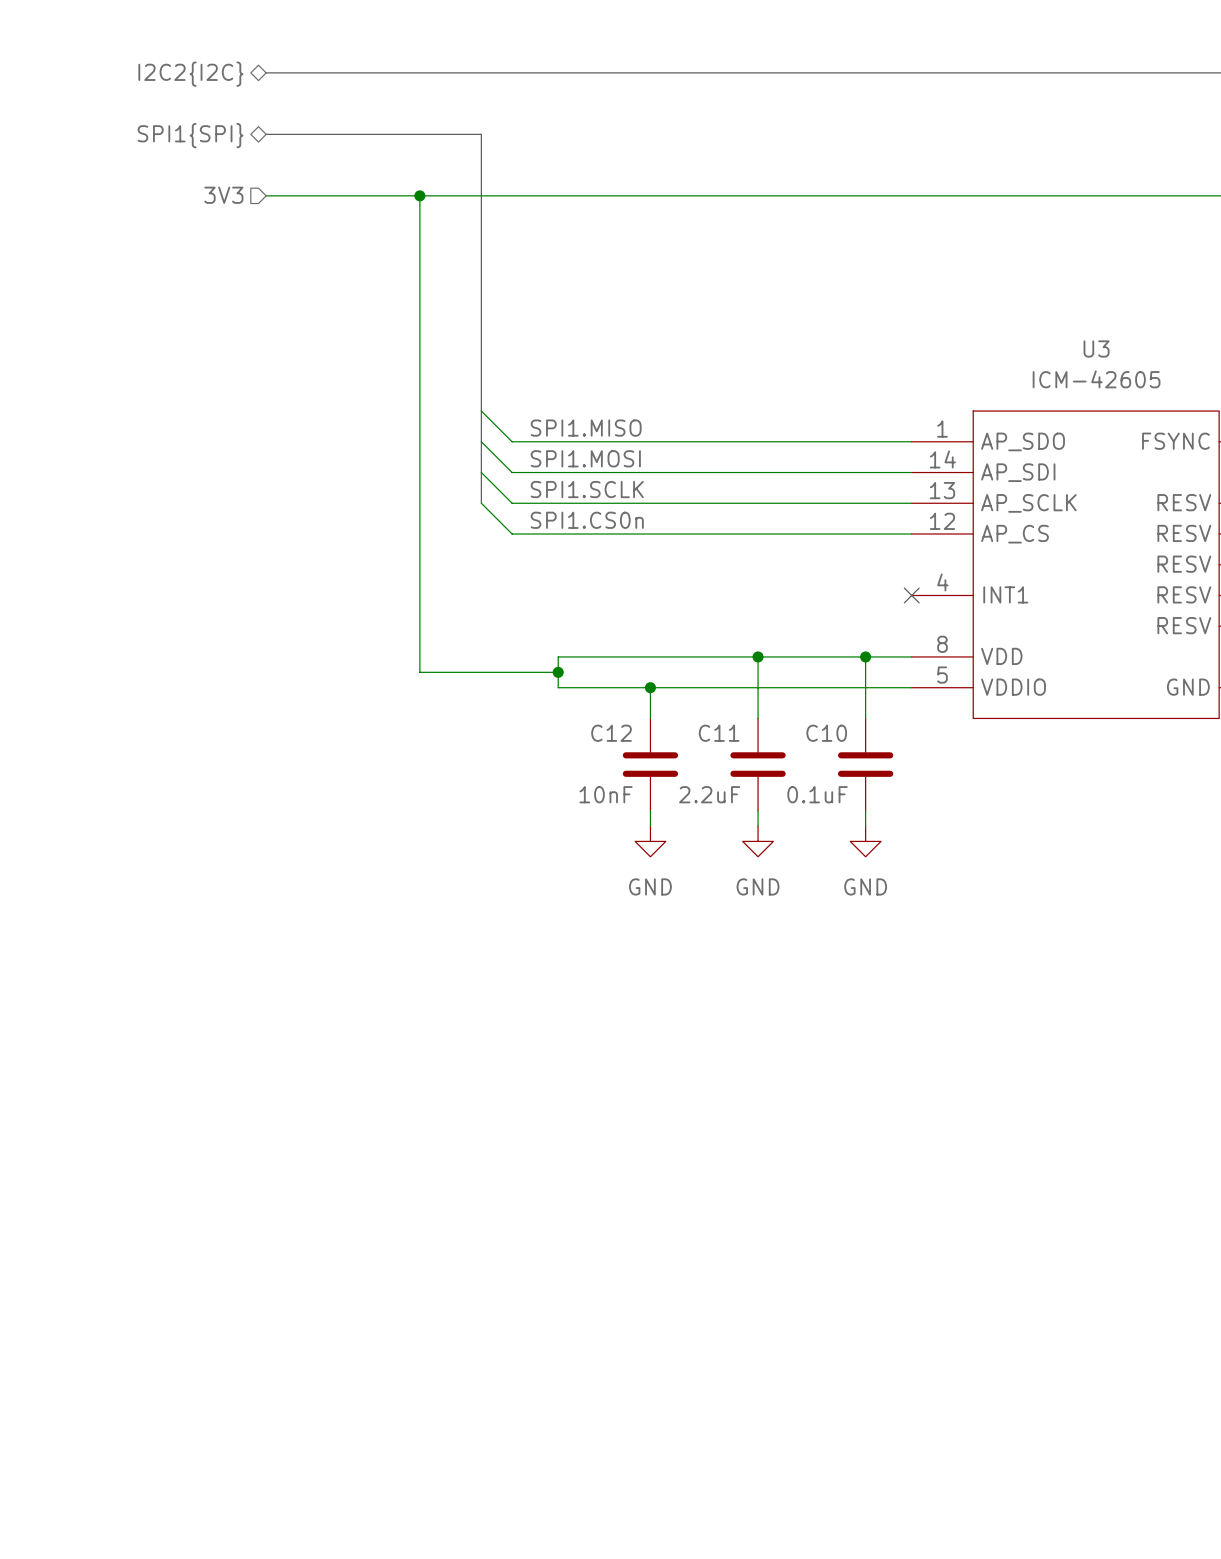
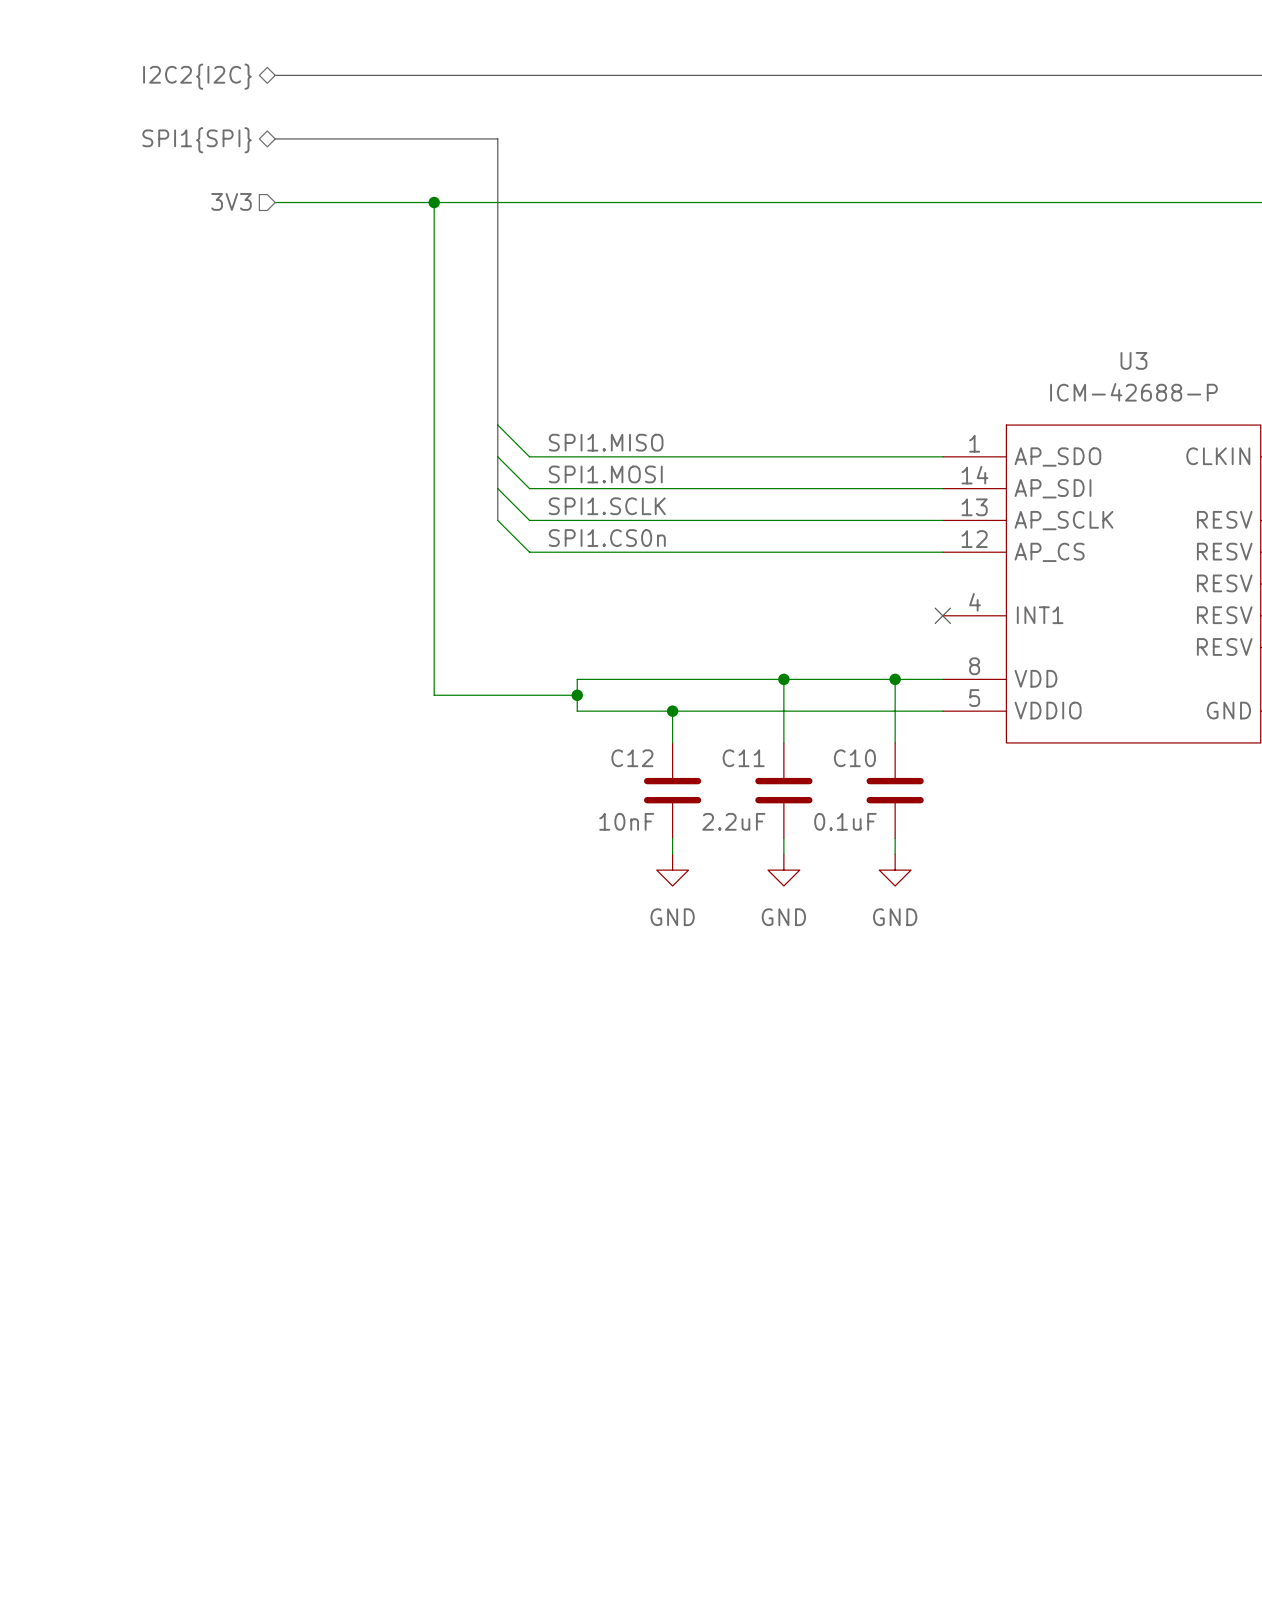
U3 value: ICM-42605 (1096, 379) -> ICM-42688-P (1133, 392)
U3 pin name: FSYNC (1175, 441) -> CLKIN (1218, 456)

